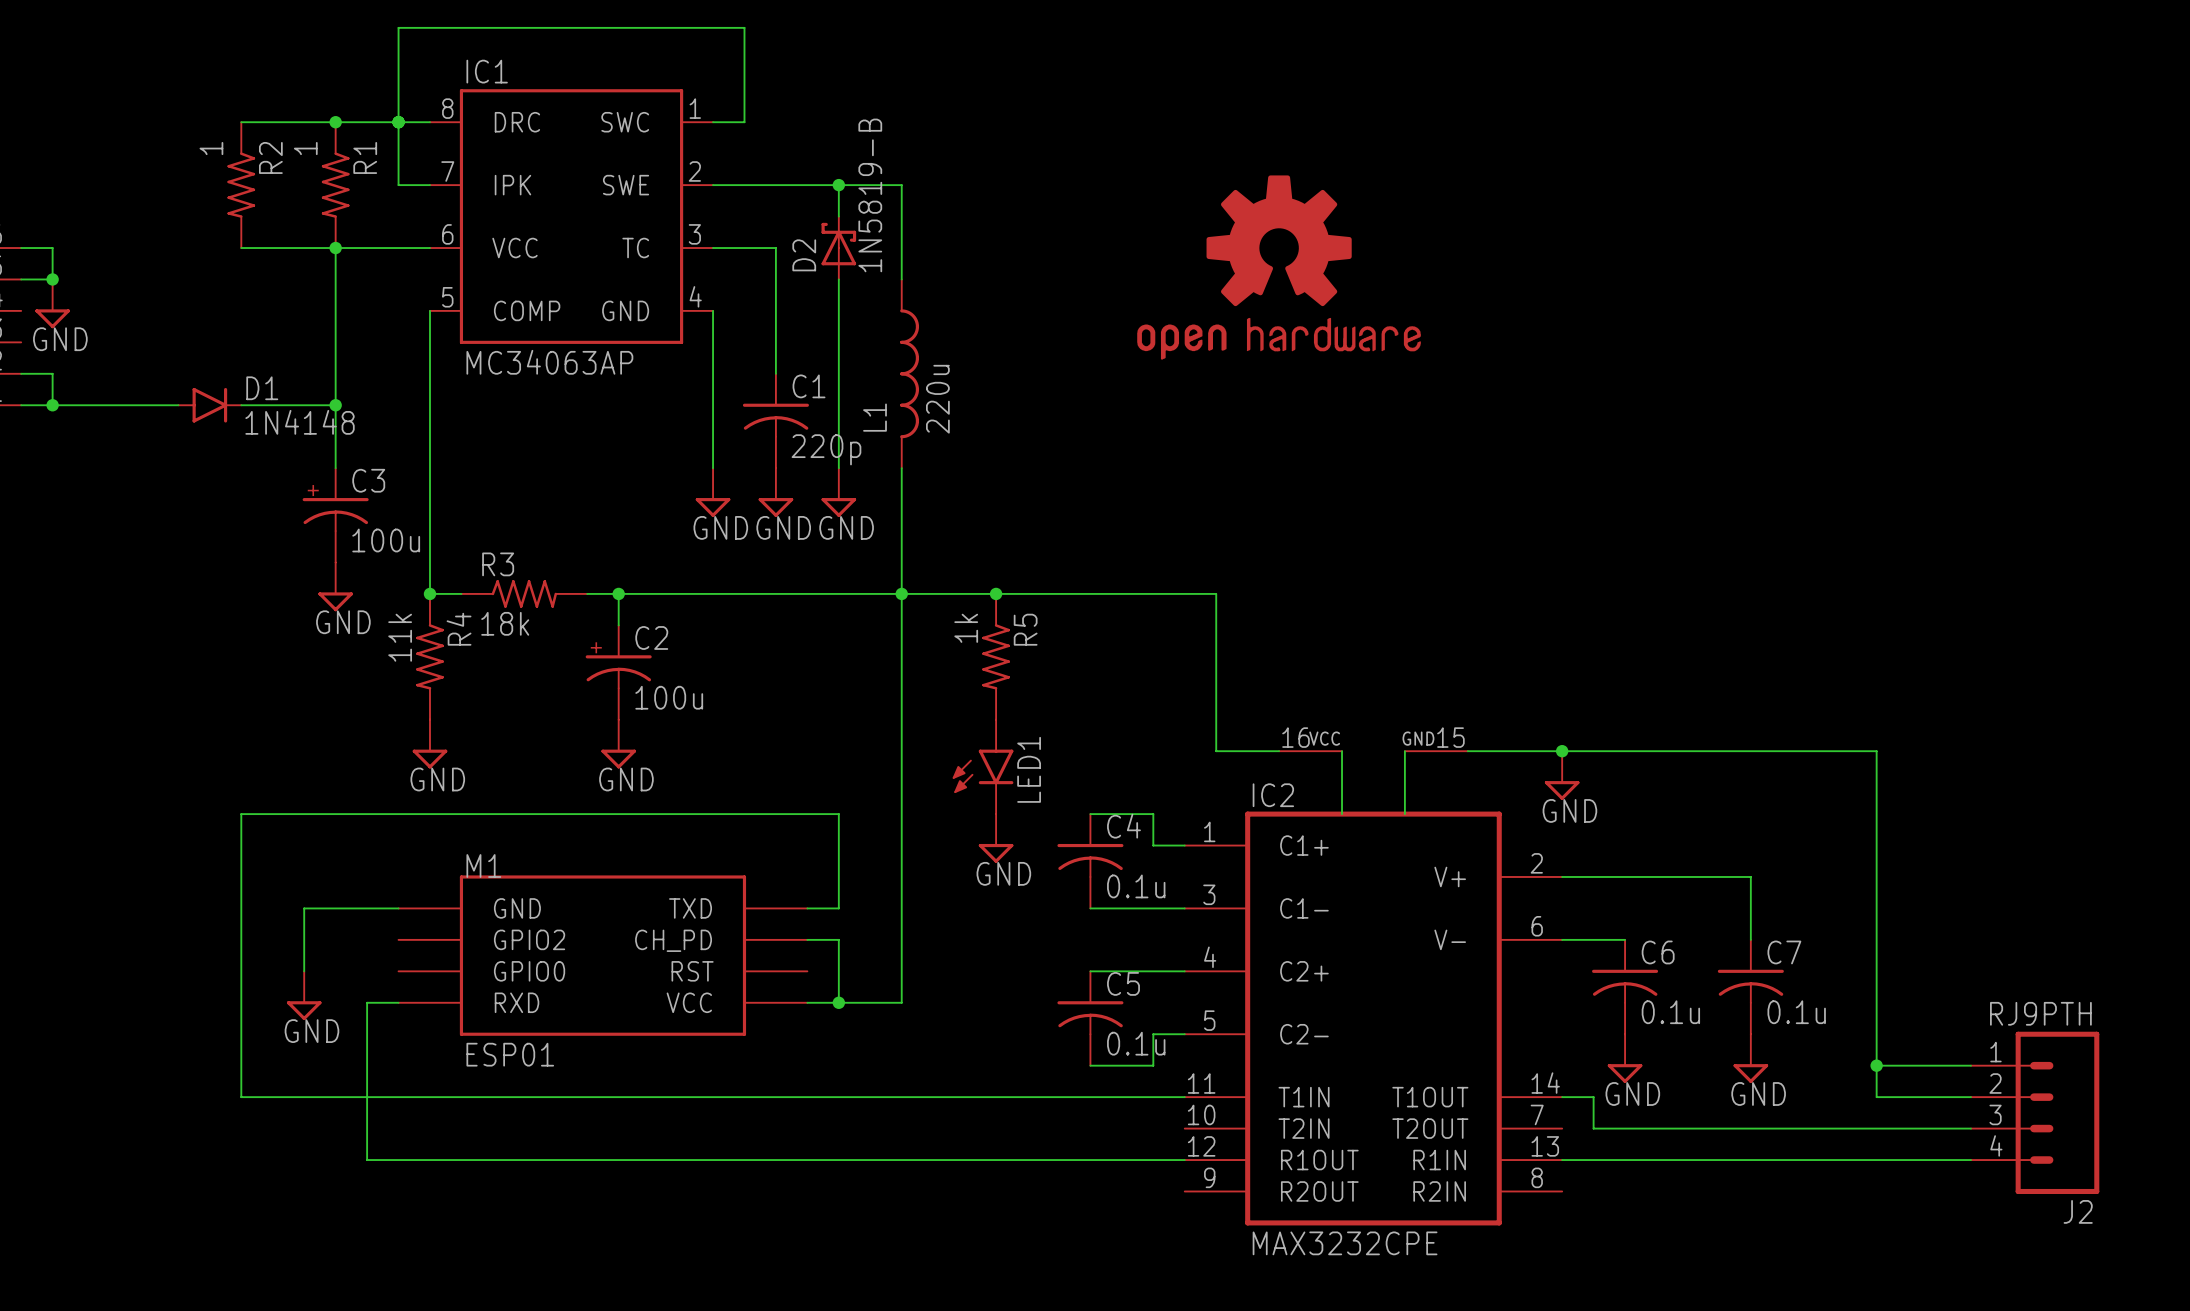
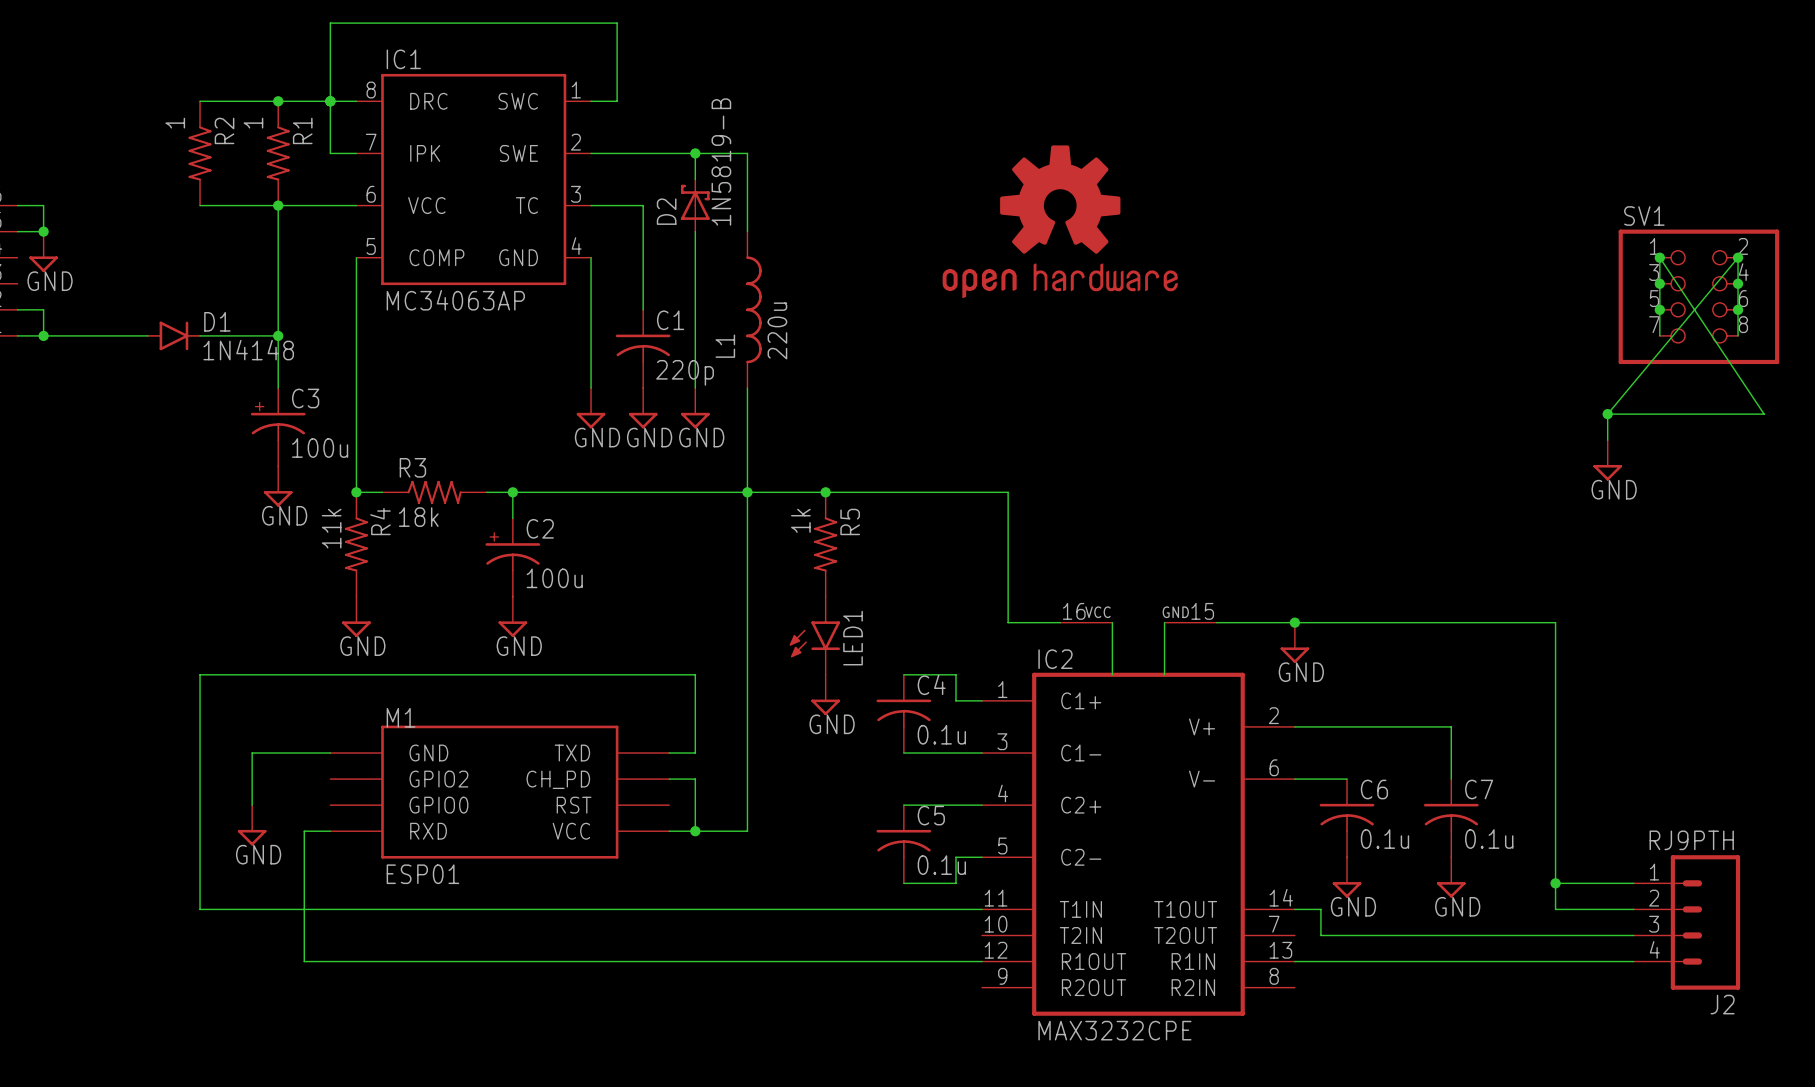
junction: none -> (1659, 257)
junction: none -> (1738, 257)
junction: none -> (1659, 283)
junction: none -> (1738, 283)
SV1: none -> (1698, 296)
junction: none -> (1659, 309)
junction: none -> (1738, 309)
wire: none -> (1659, 335) (1659, 257) (1764, 414) (1607, 414)
wire: none -> (1738, 335) (1738, 257) (1607, 414)
wire: none -> (1607, 414) (1607, 440)
junction: none -> (1607, 414)
power symbol: none -> GND (1607, 460)

